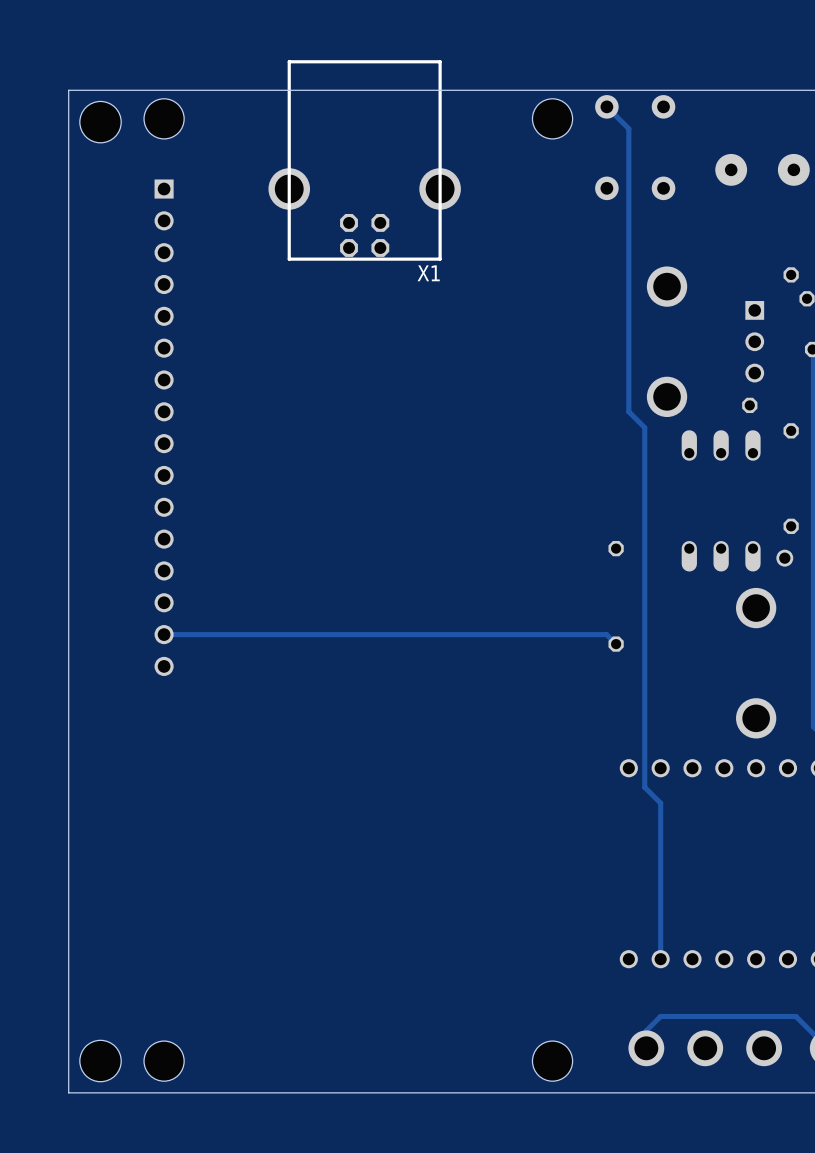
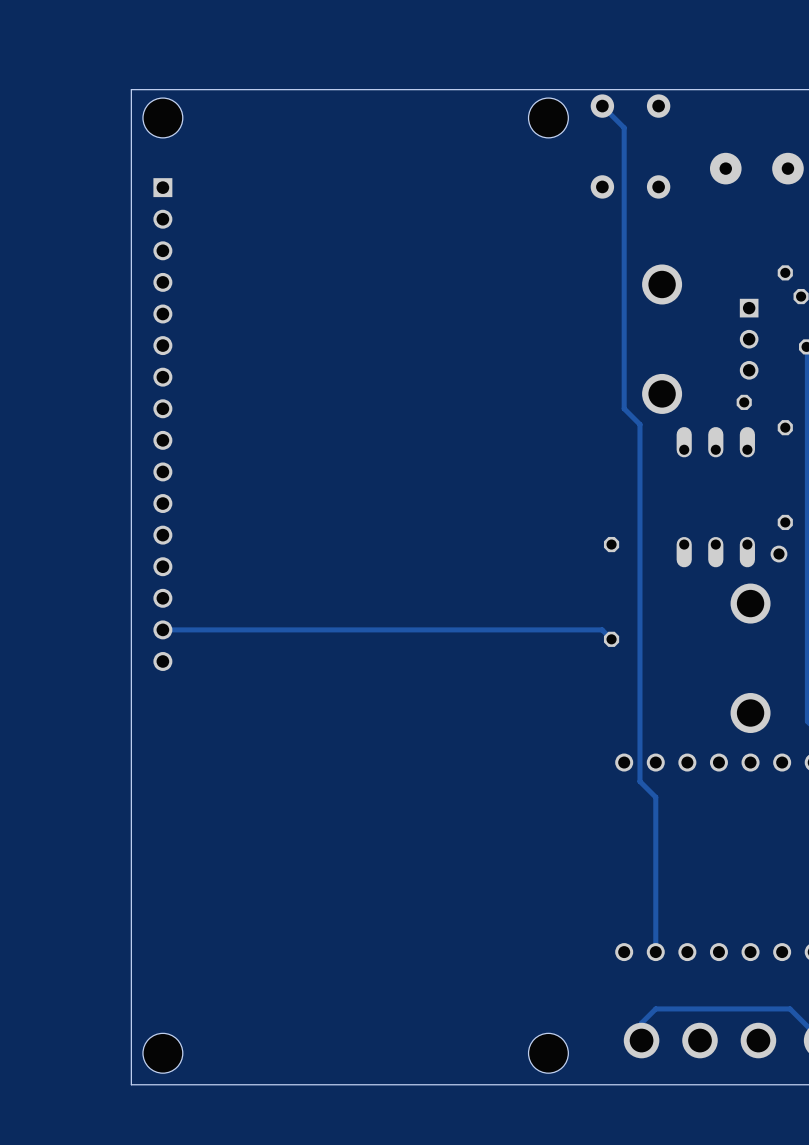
board edge: (132, 90) (68, 90) (68, 1092) (132, 1092) -> (131, 89) (131, 1084)
part: (100, 122) -> none
X1: (364, 160) -> none
part: (100, 1061) -> none

